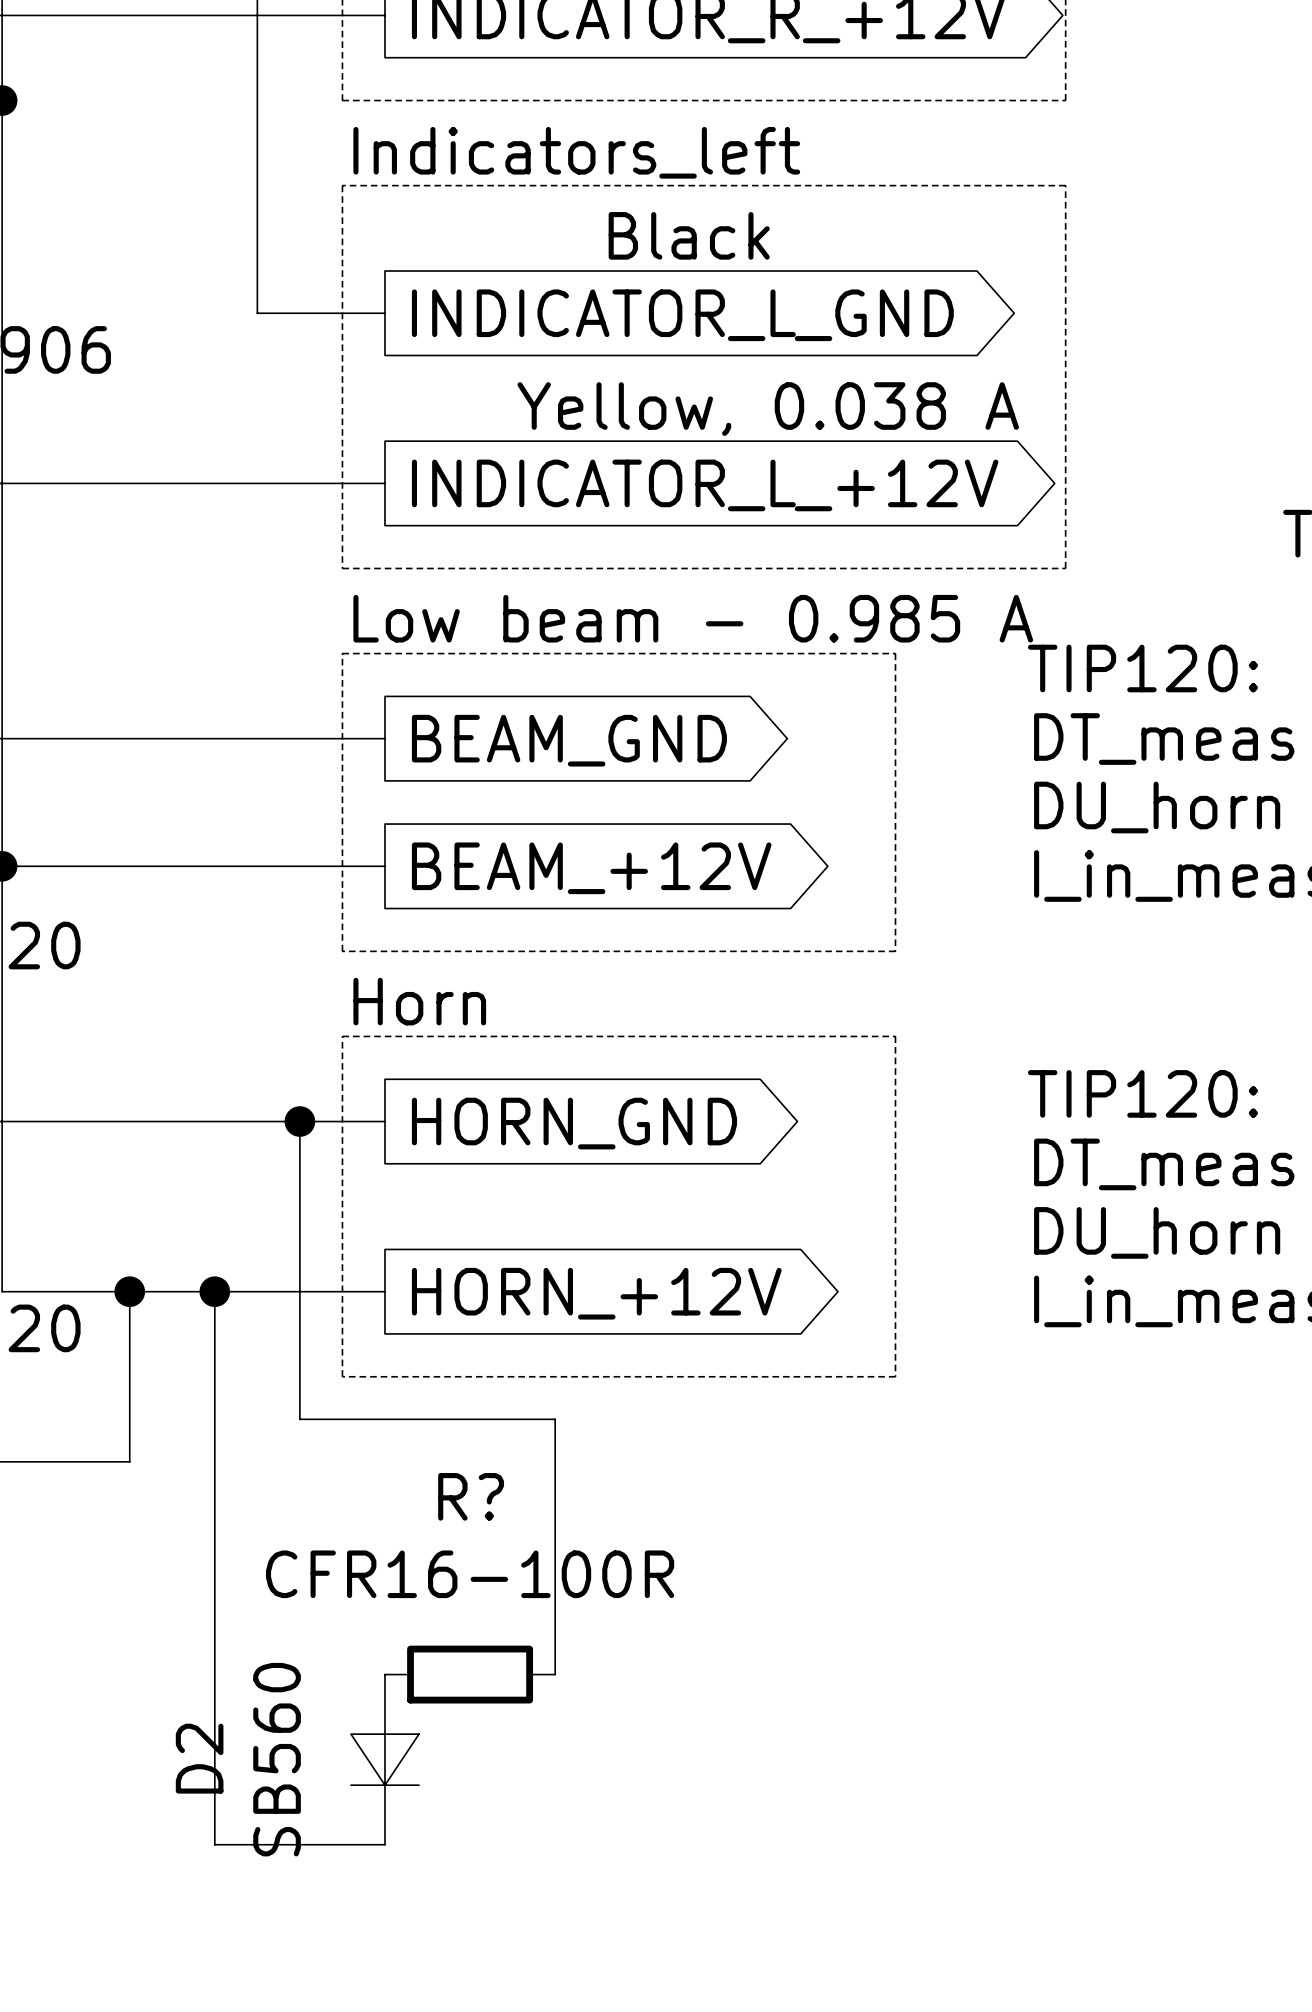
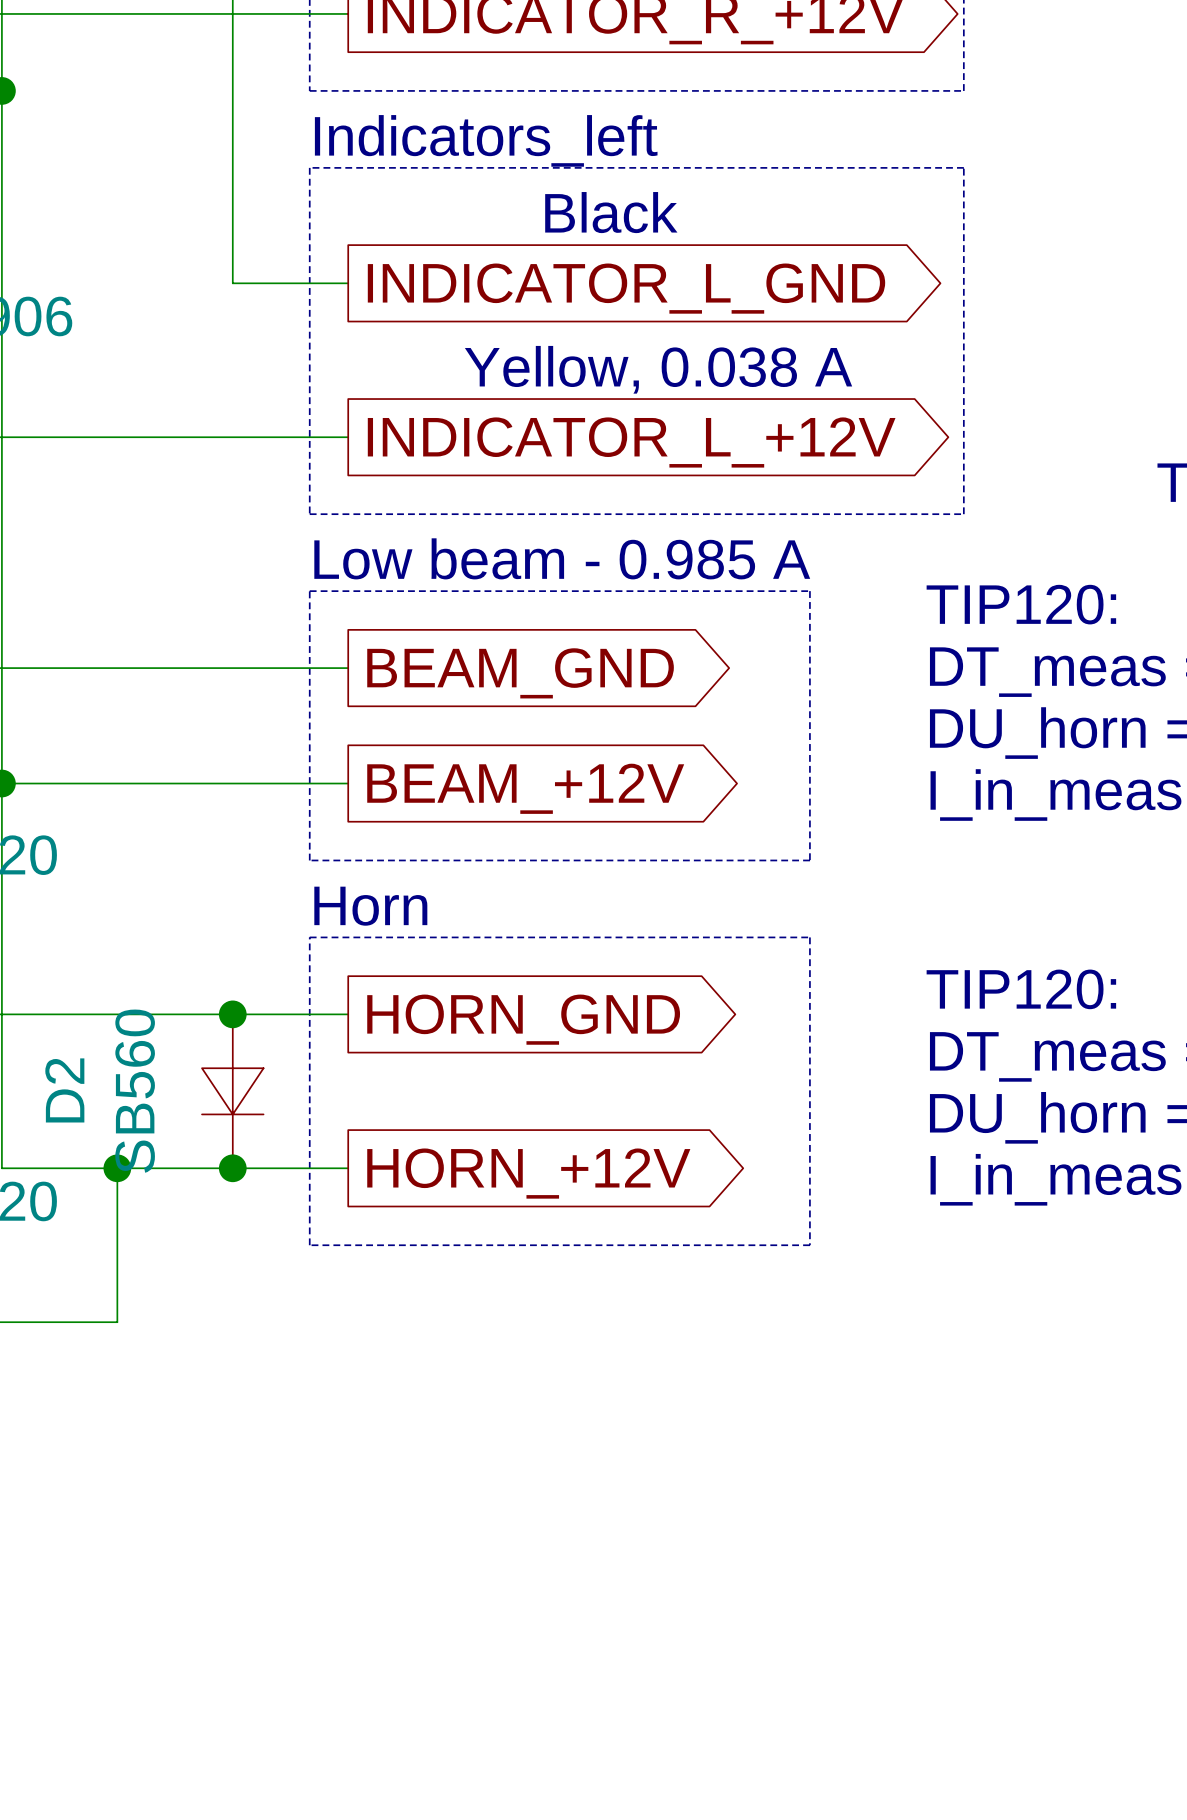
wire: (299, 1121) (299, 1419) (555, 1419) (555, 1674) -> none
junction position: (299, 1121) -> (232, 1014)
wire: (214, 1291) (214, 1844) (384, 1844) -> none
junction position: (214, 1291) -> (232, 1168)
R?: CFR16-100R (470, 1674) -> none
D2 position: (384, 1759) -> (232, 1091)

